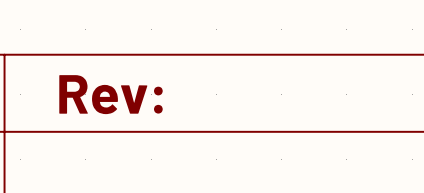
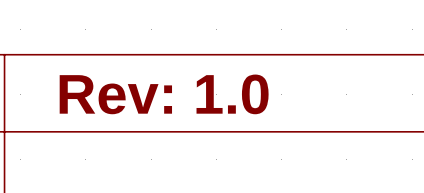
title block: Rev: (111, 94) -> Rev: 1.0 (164, 94)

